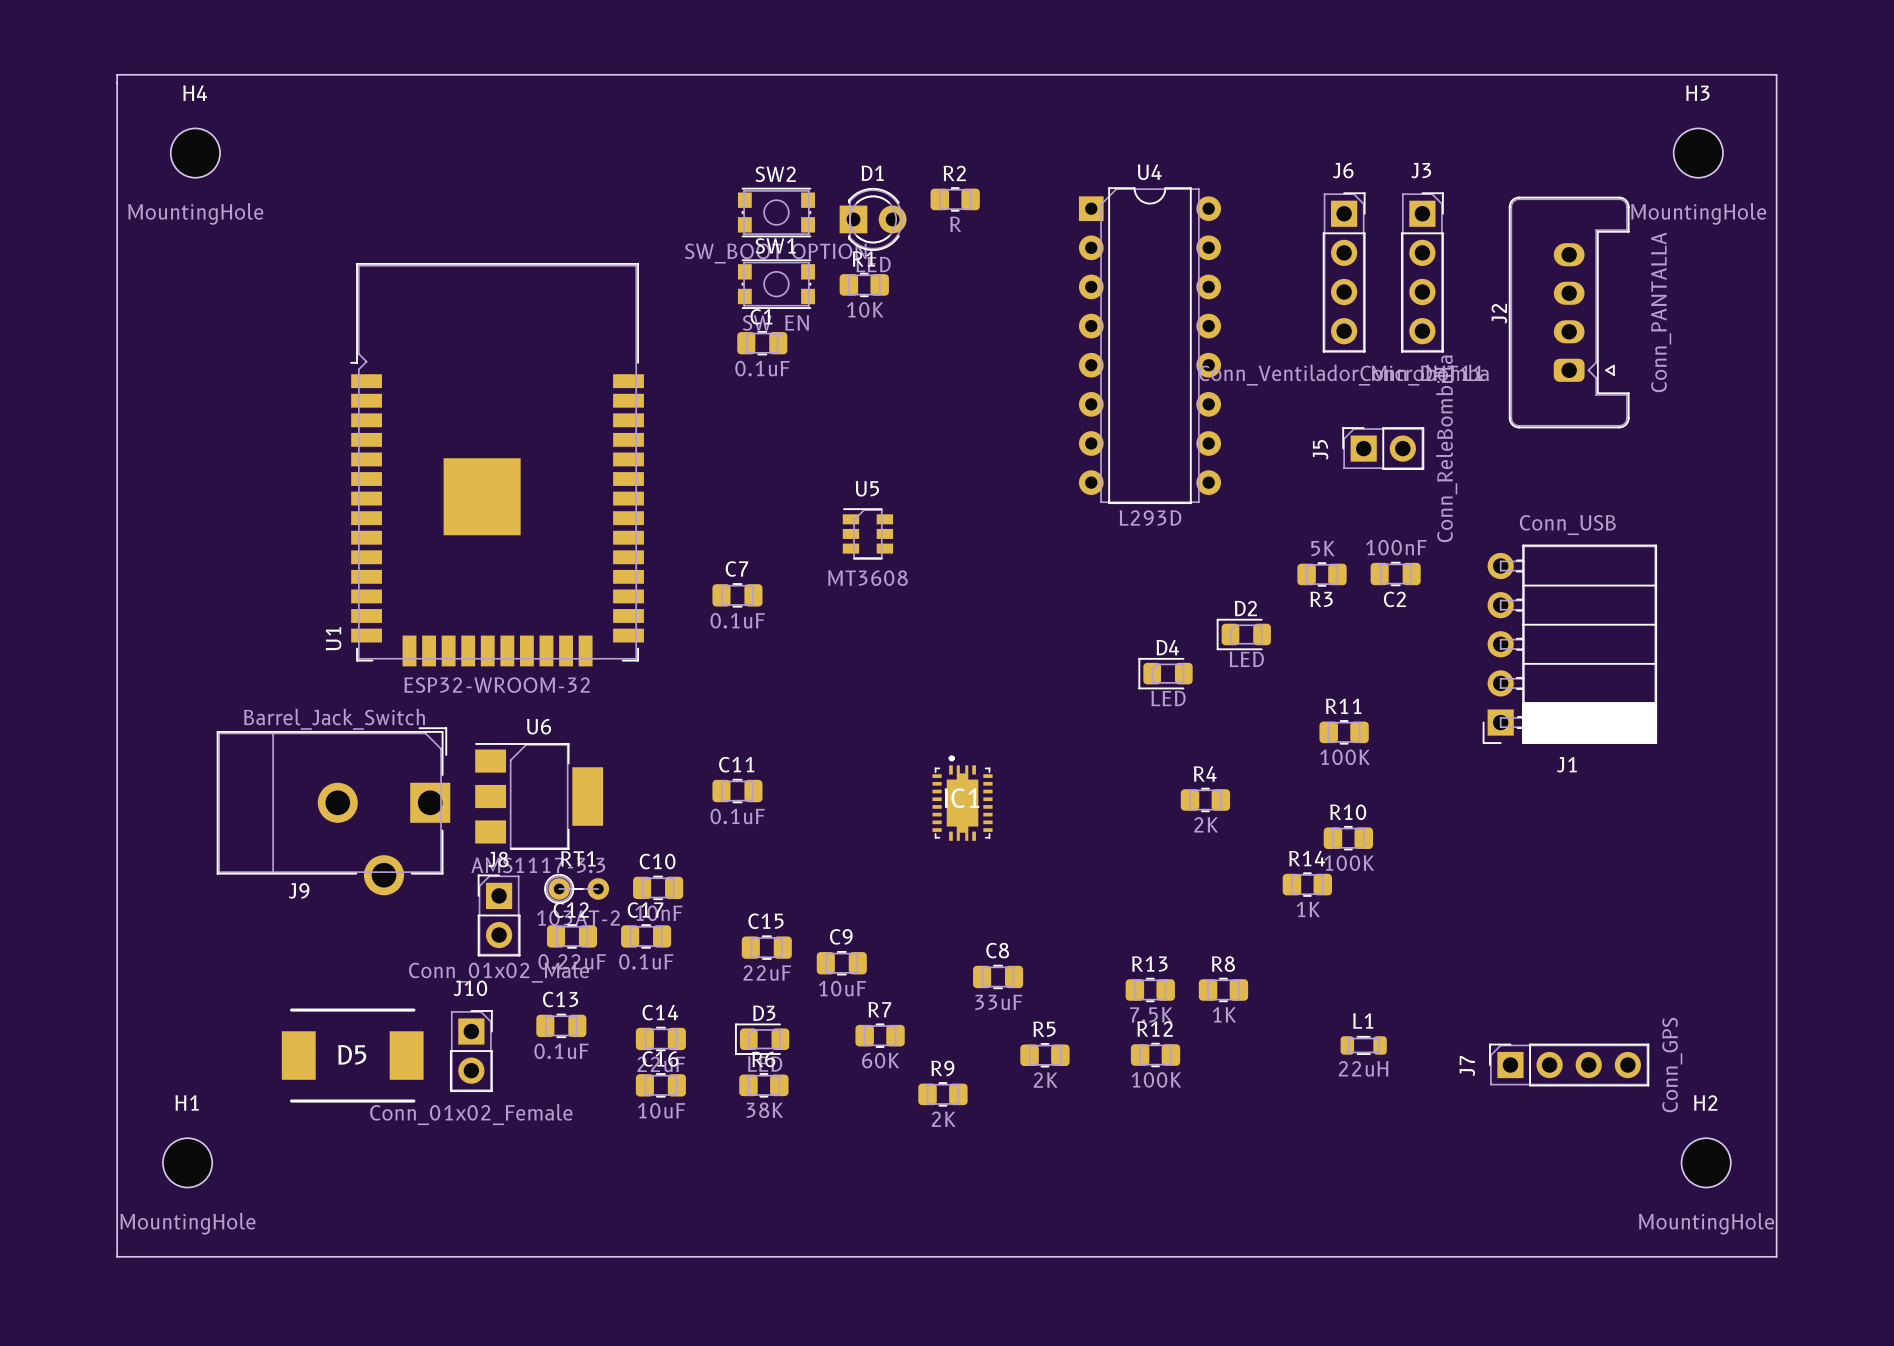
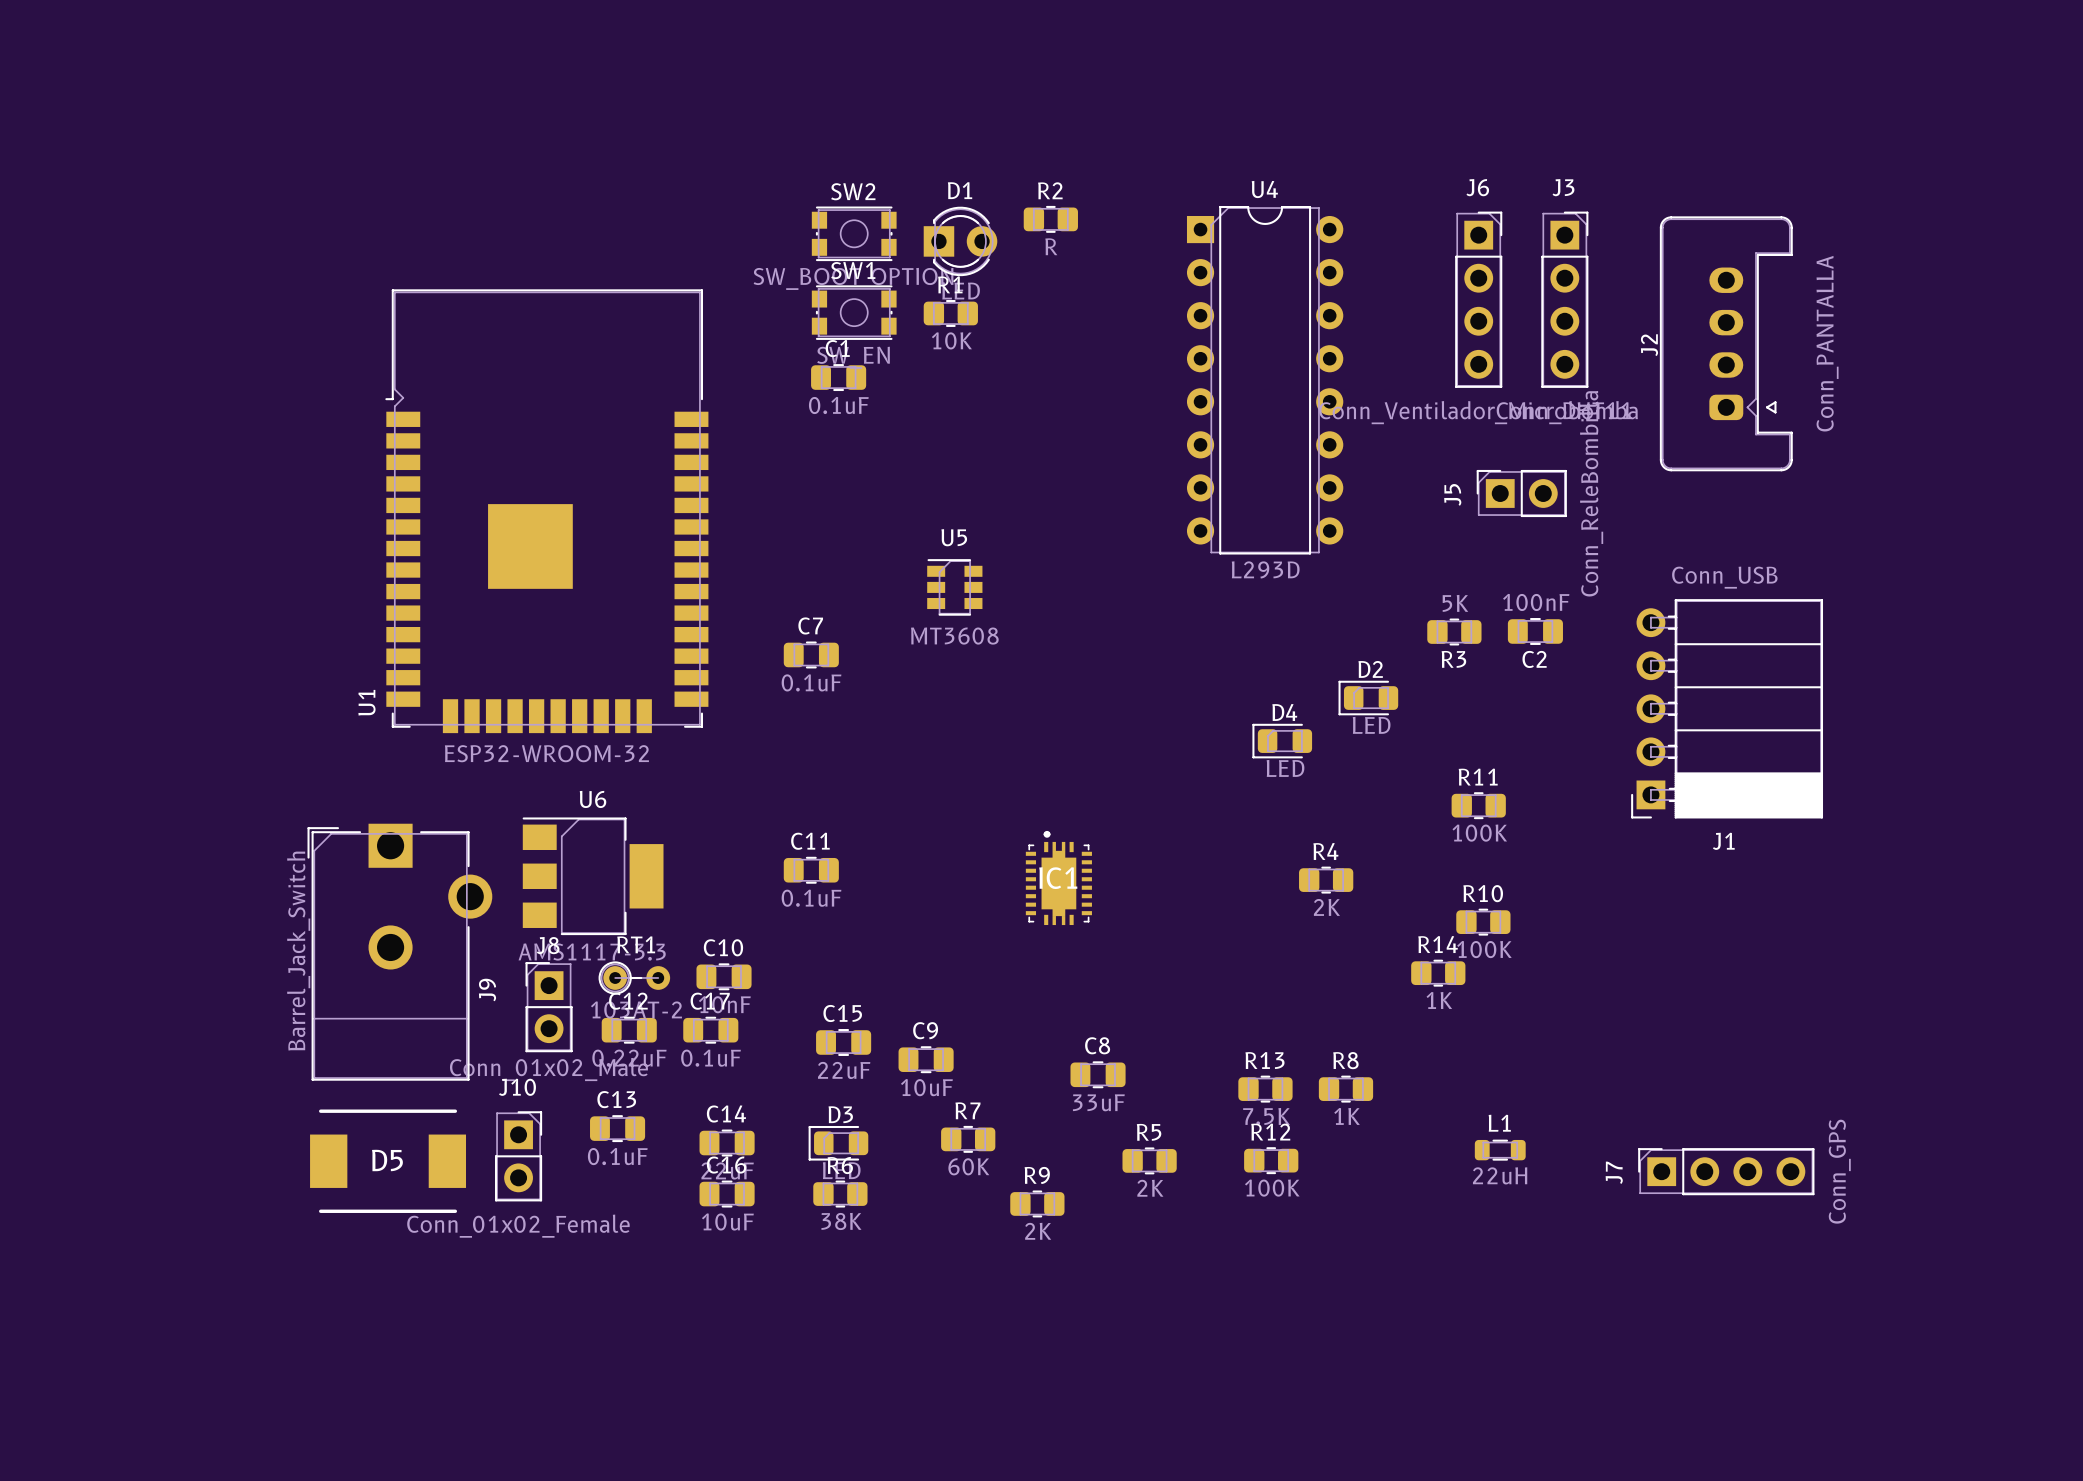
board edge: (117, 74) (117, 1256) (1776, 1256) (1776, 74) (117, 74) -> none
H4: MountingHole (195, 153) -> none
H3: MountingHole (1698, 153) -> none
J9 rotation: 0° (333, 811) -> 90° counterclockwise (399, 952)
H1: MountingHole (187, 1162) -> none
H2: MountingHole (1706, 1162) -> none

